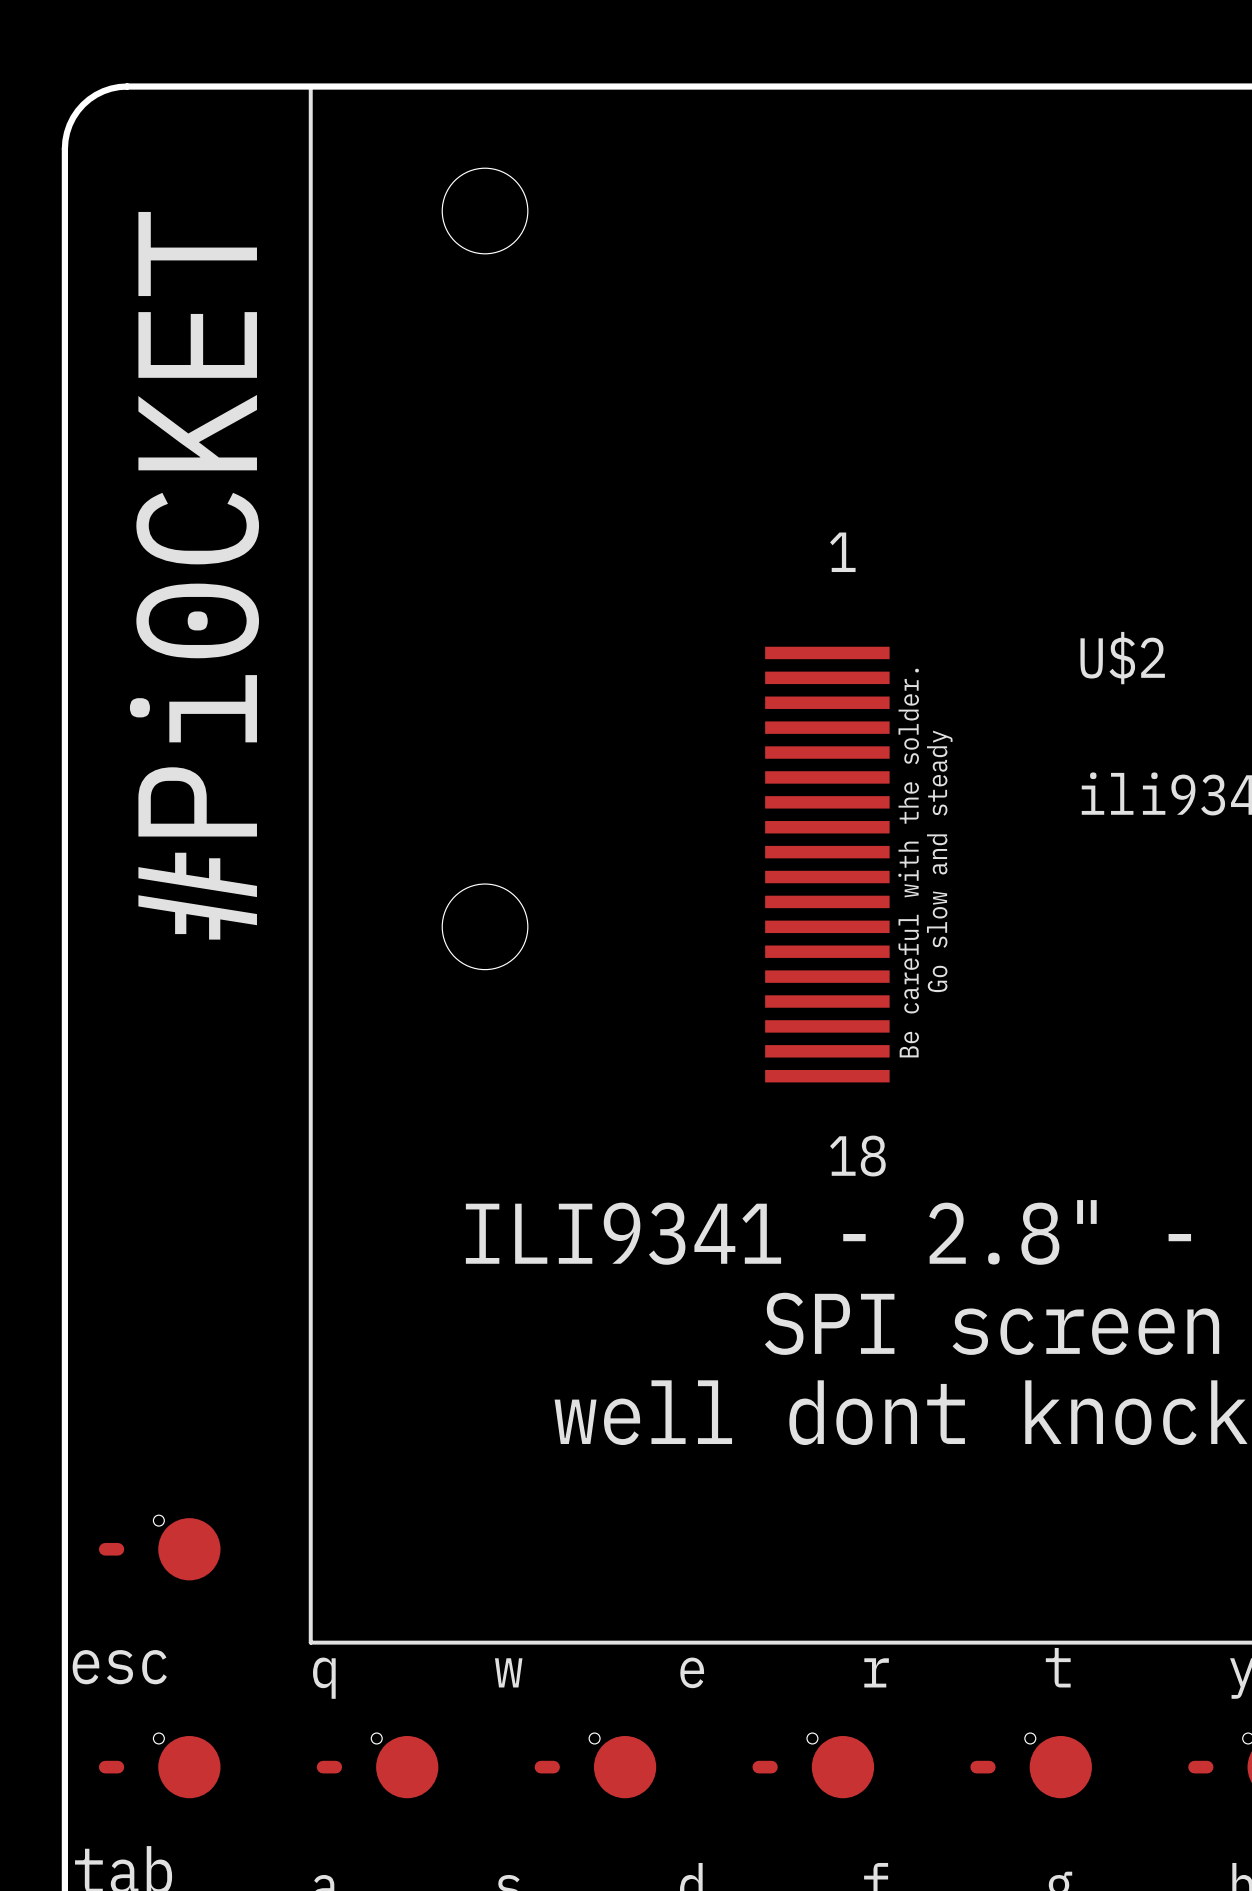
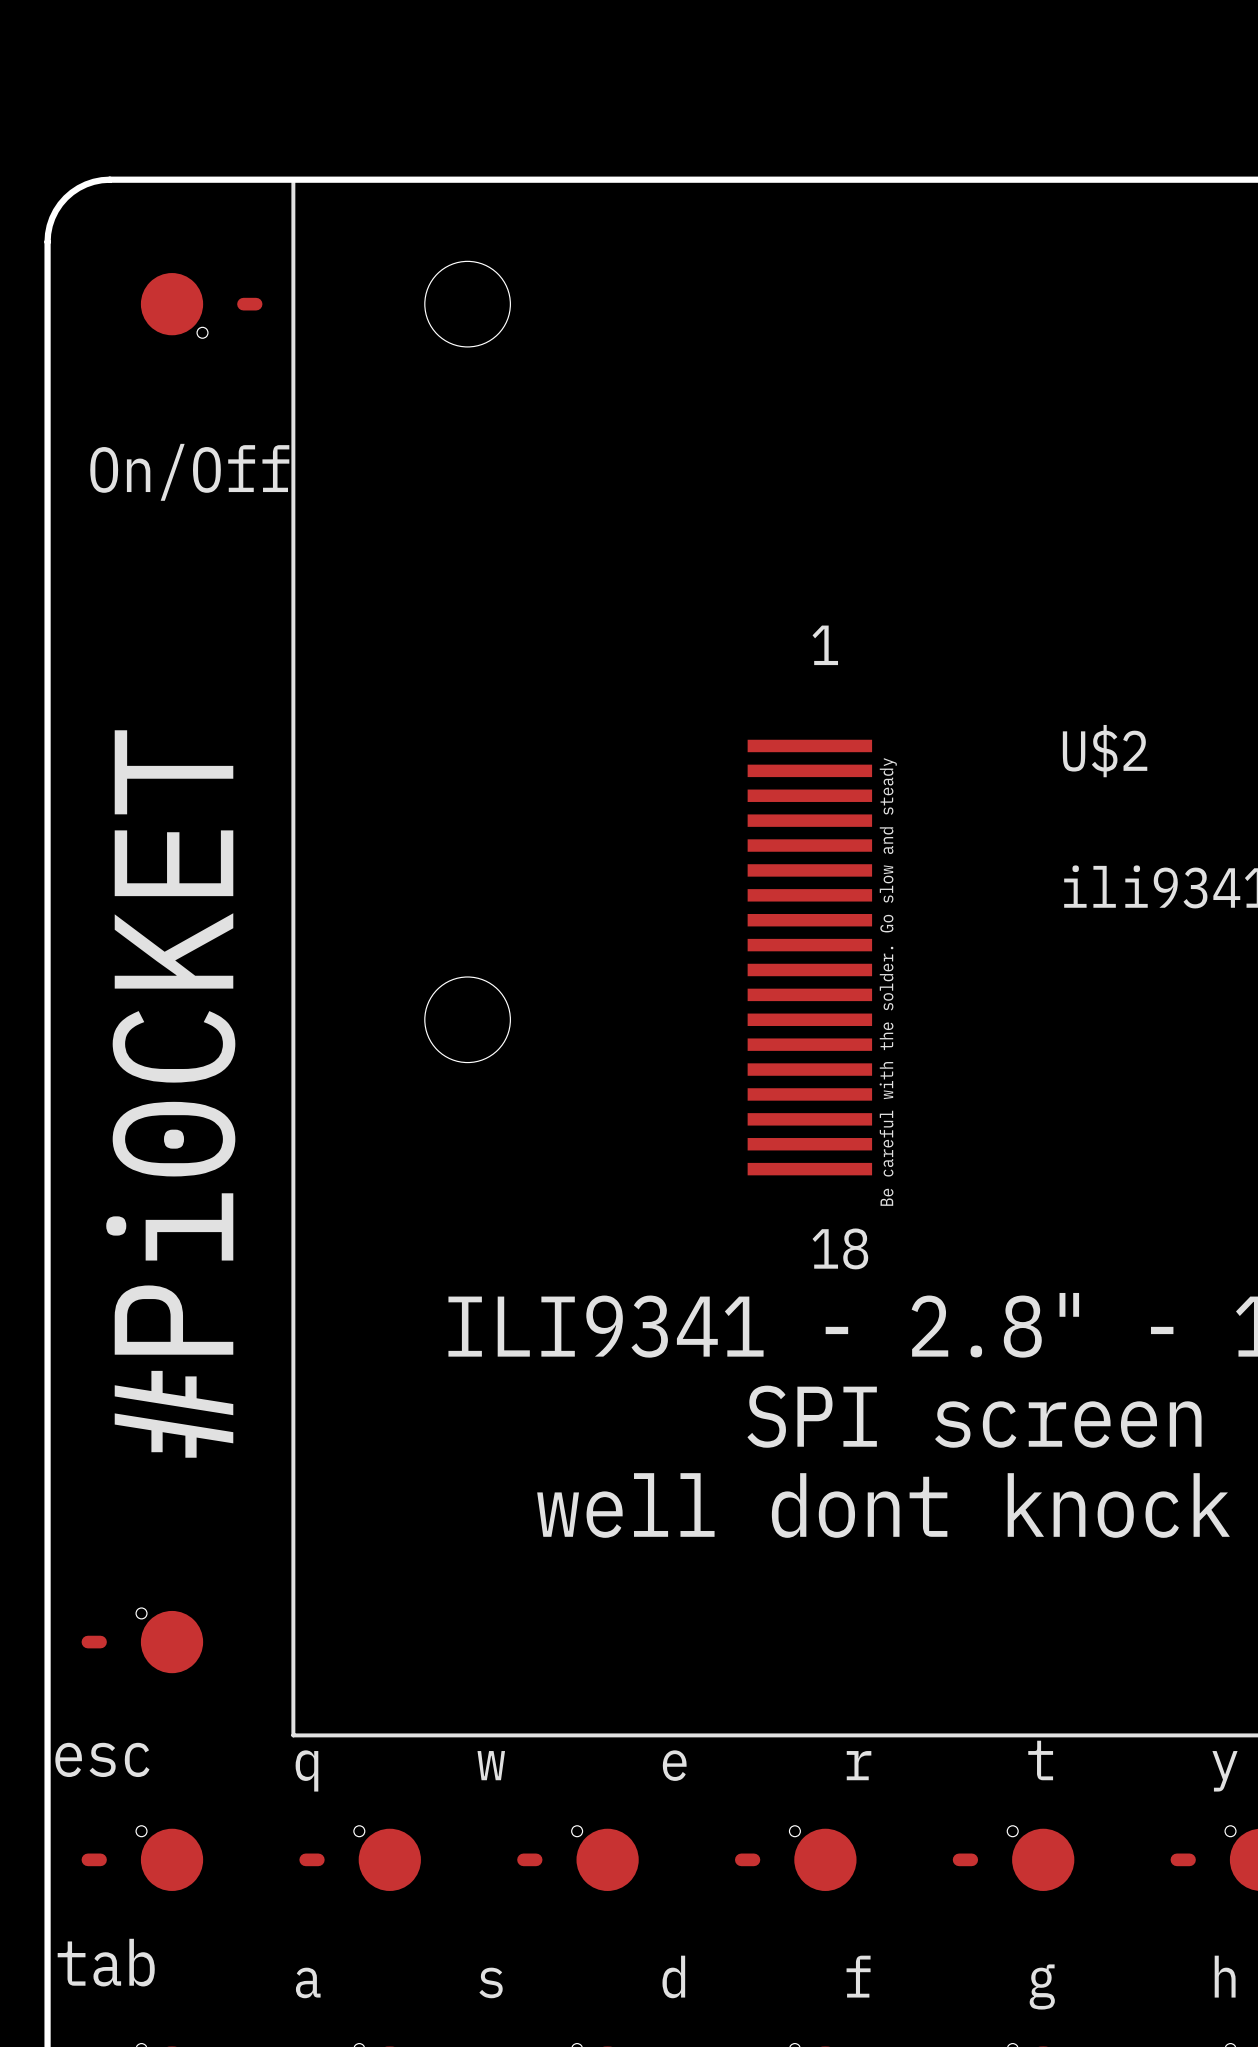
part: none -> (201, 305)
text: none -> On/Off (189, 472)
text position: #Pi0CKET (194, 575) -> #Pi0CKET (170, 1094)
text: Go slow and steady (939, 861) -> none
text: Be careful with the solder. (908, 863) -> Be careful with the solder. Go slow and steady (888, 981)

